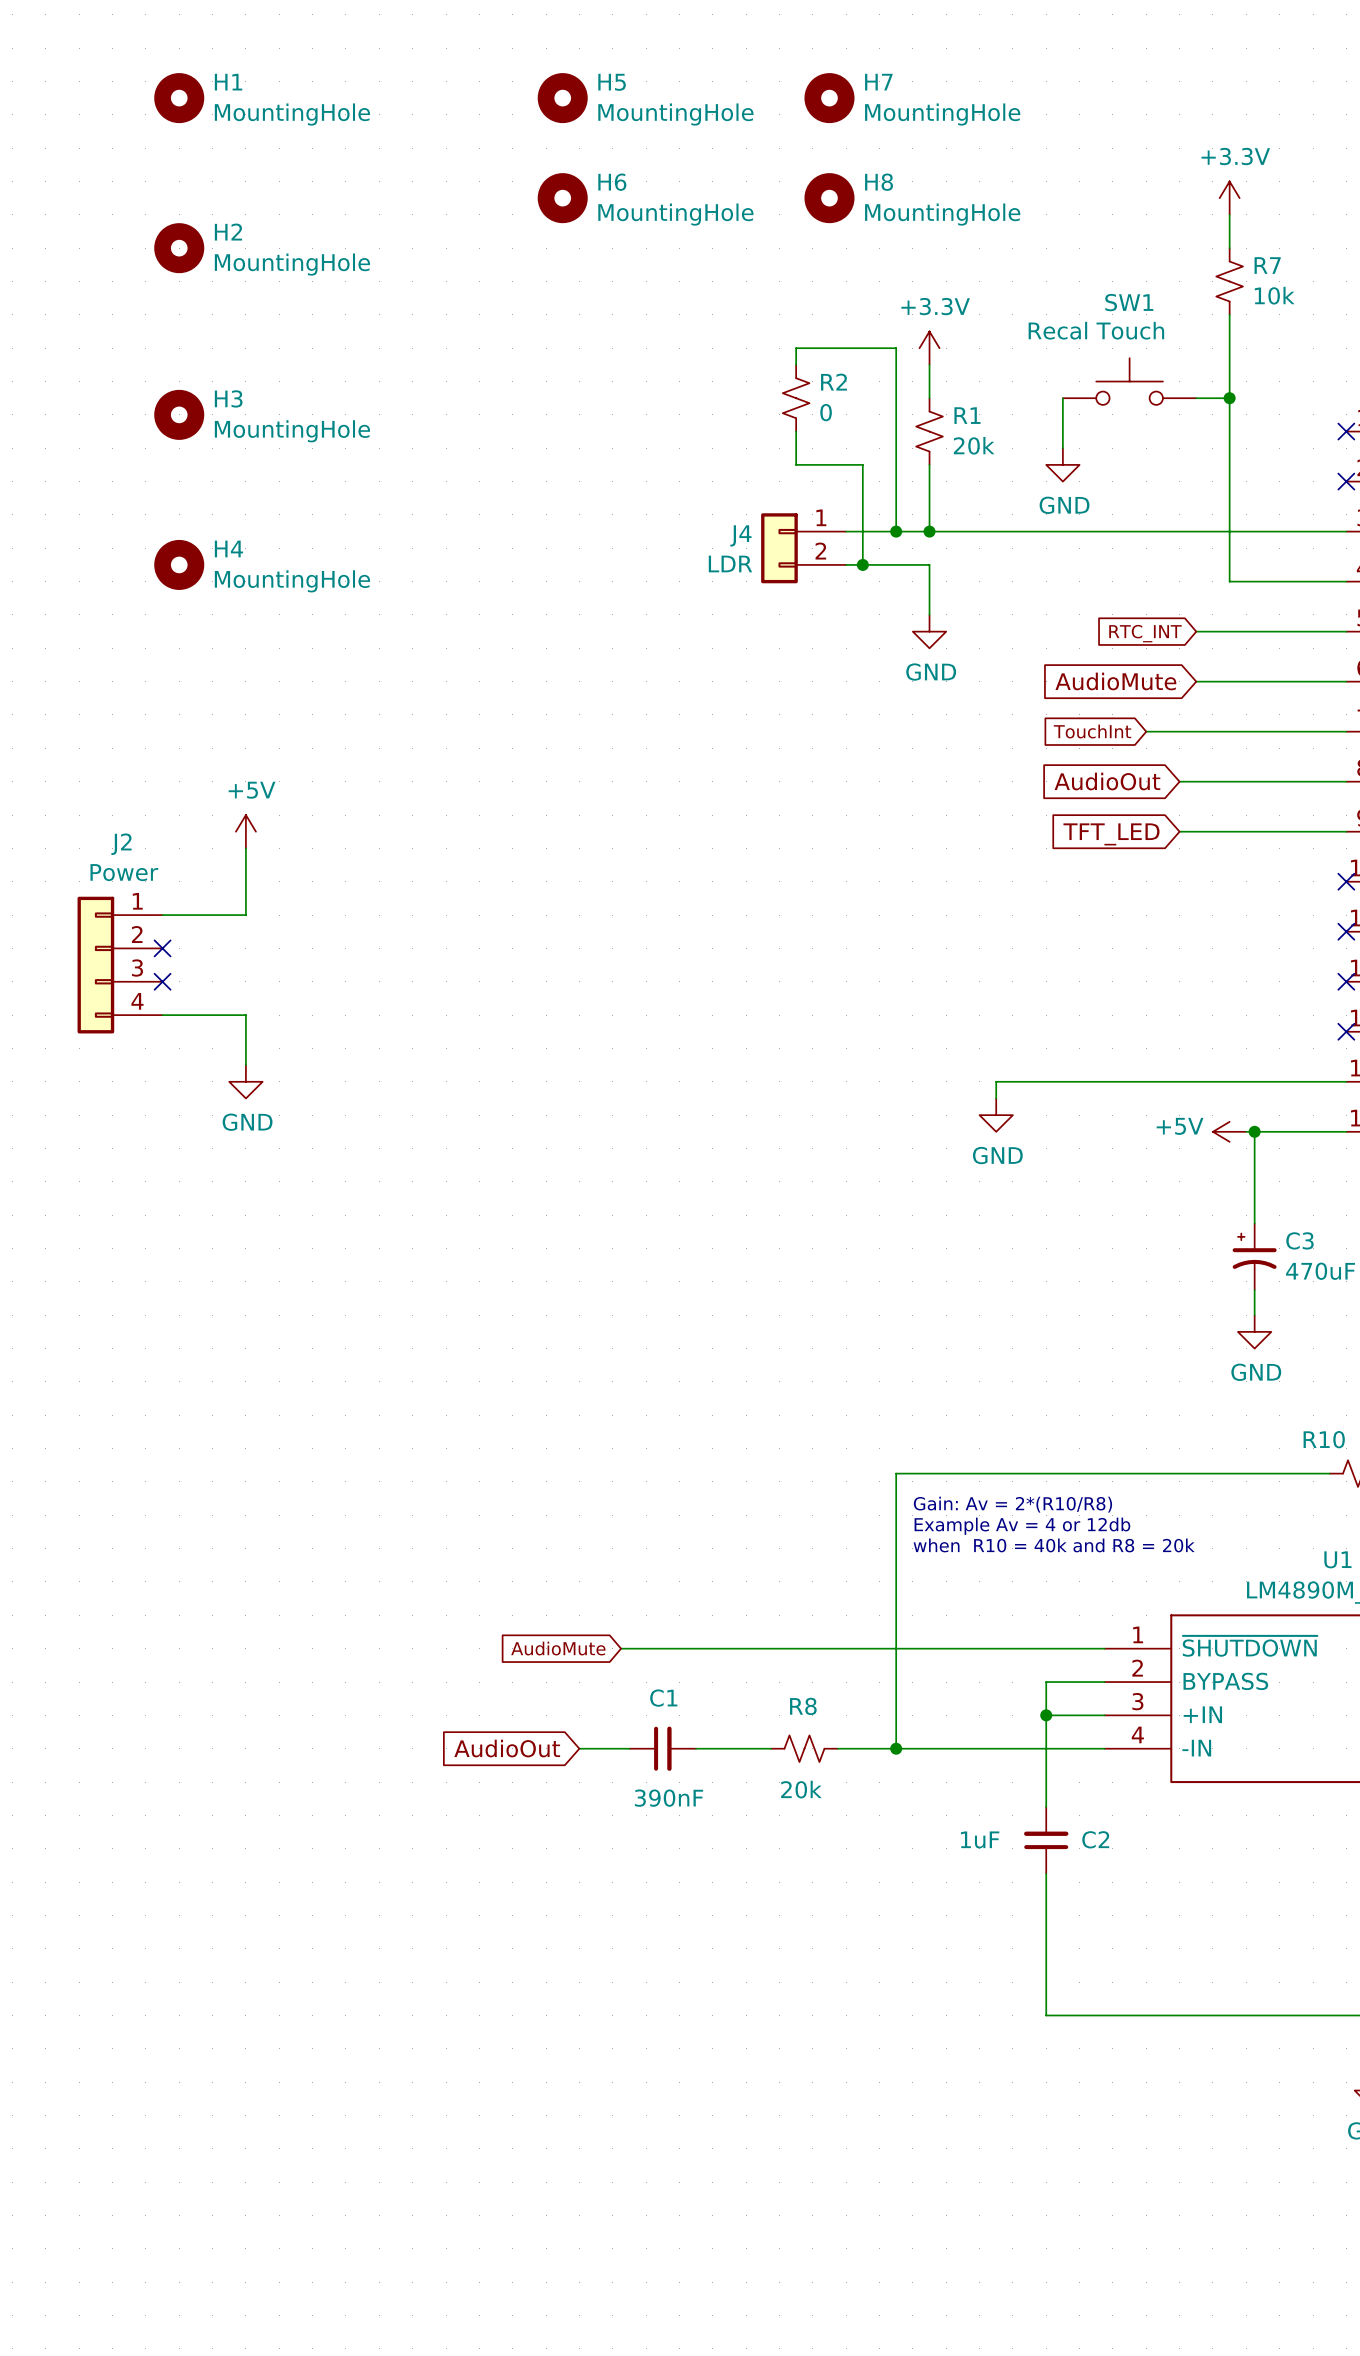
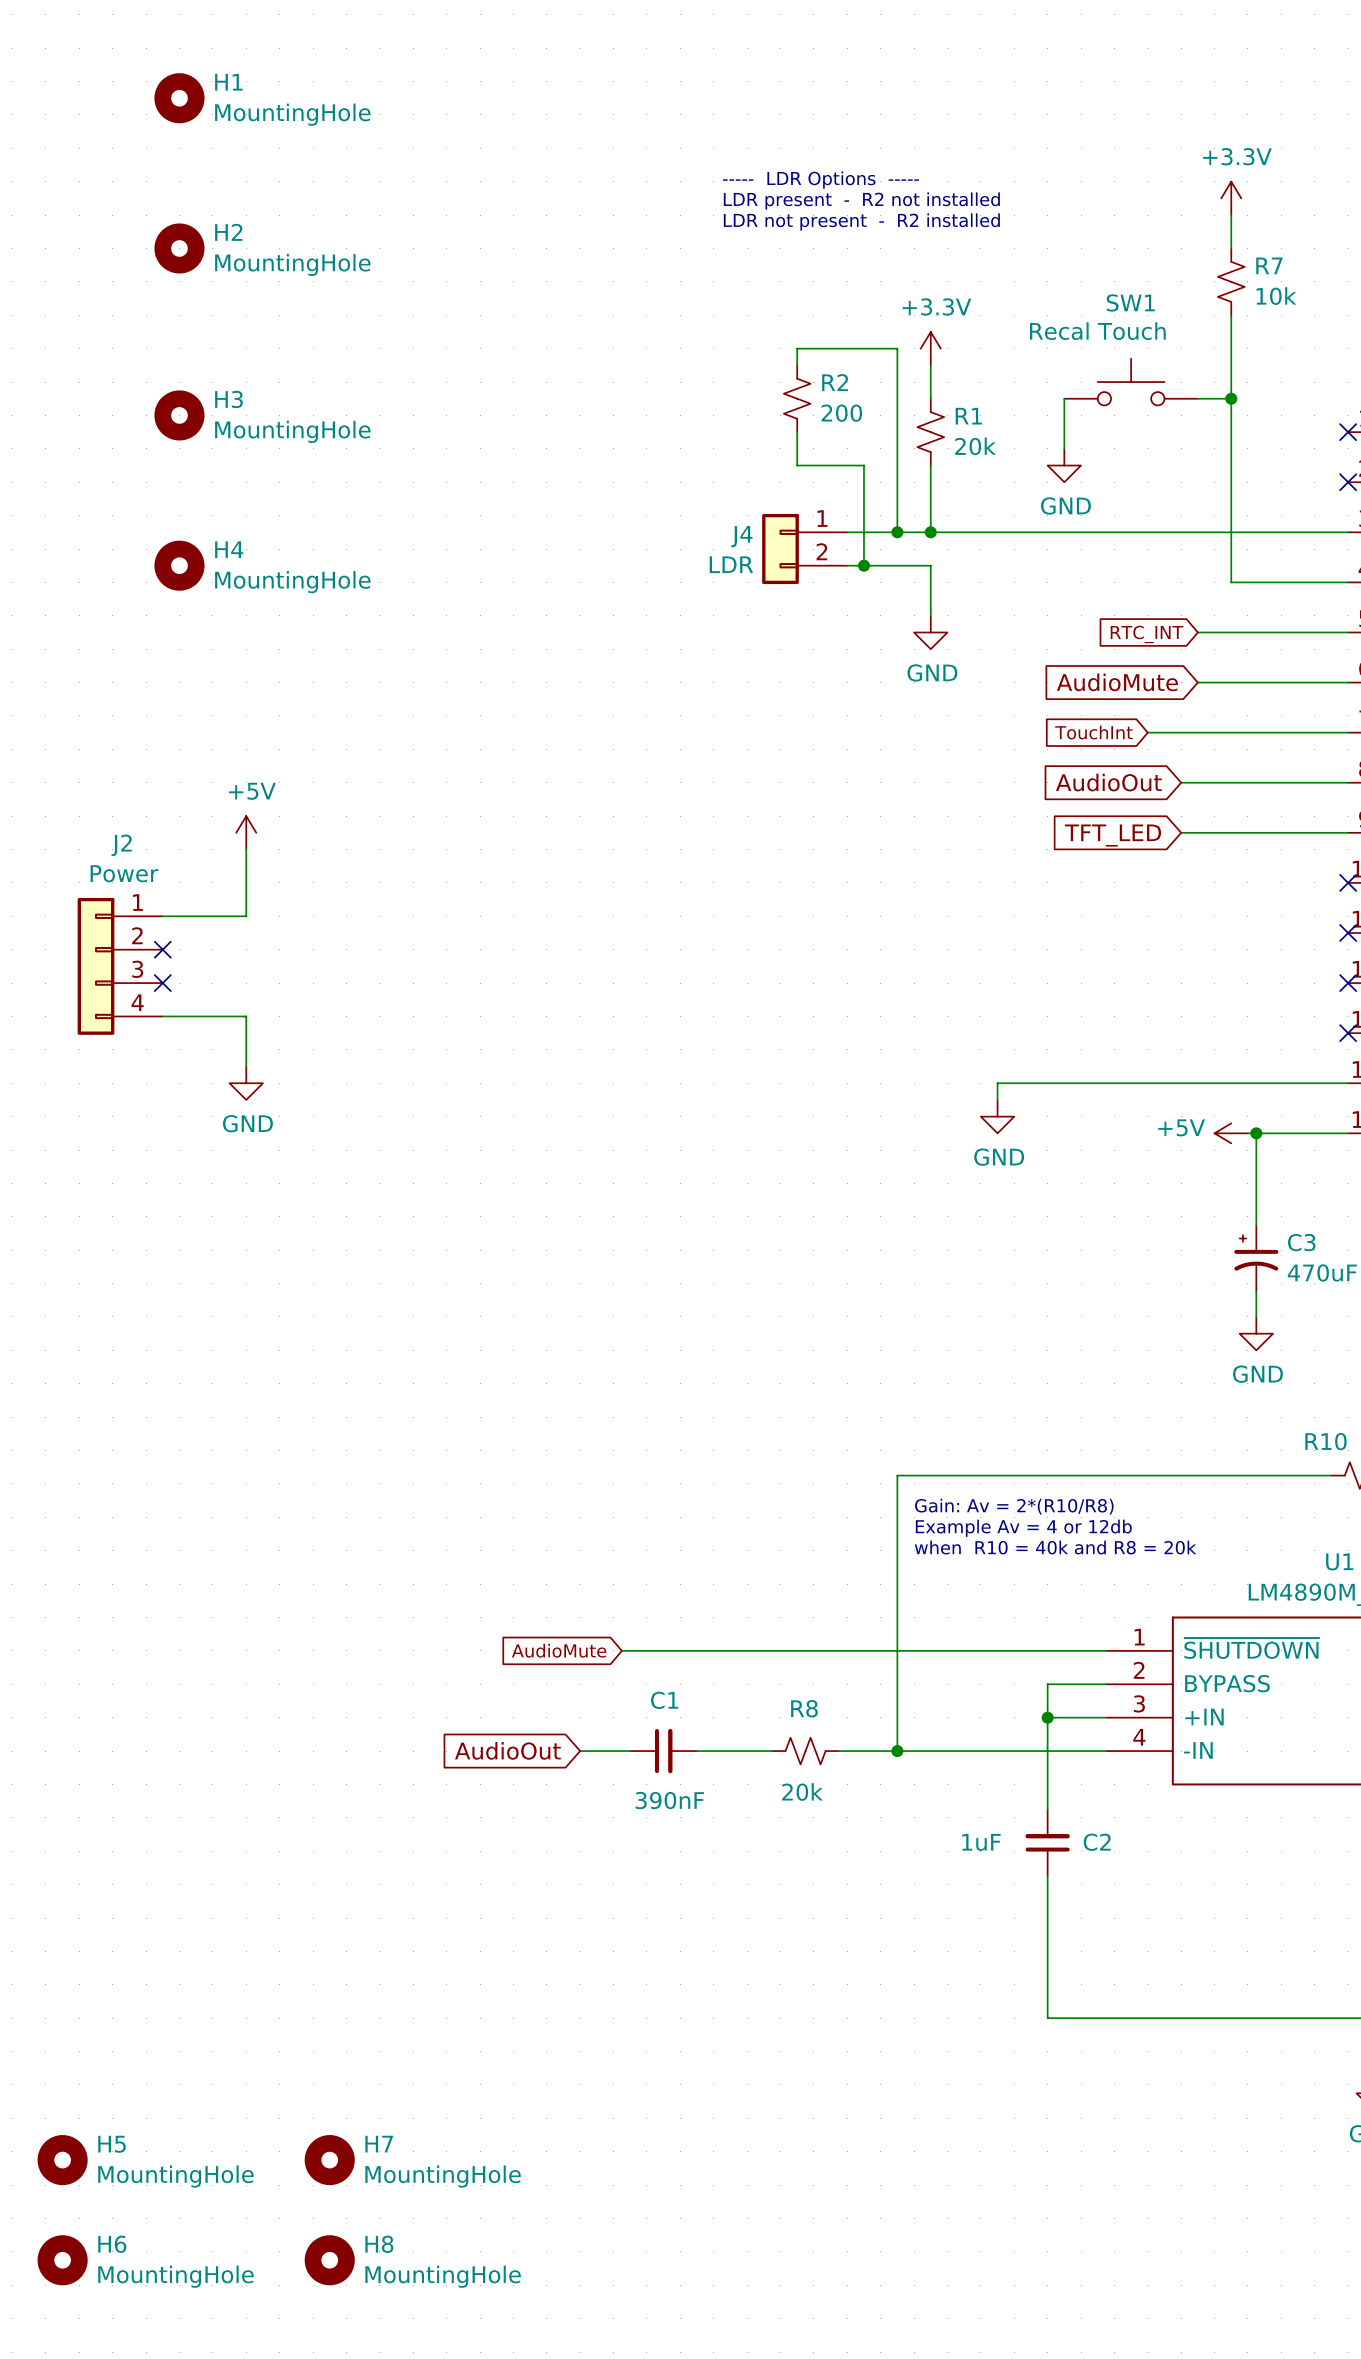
H5 position: (562, 98) -> (62, 2160)
H7 position: (829, 98) -> (329, 2160)
text: none -> ----- LDR Options ----- (821, 180)
H6 position: (562, 198) -> (62, 2260)
H8 position: (829, 198) -> (329, 2260)
text: none -> LDR present - R2 not installed (861, 201)
text: none -> LDR not present - R2 installed (861, 221)
R2 value: 0 (826, 412) -> 200 (841, 413)

